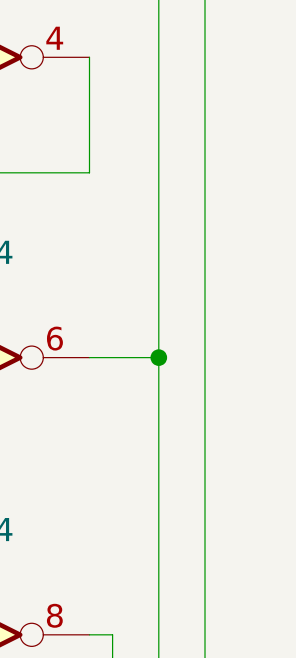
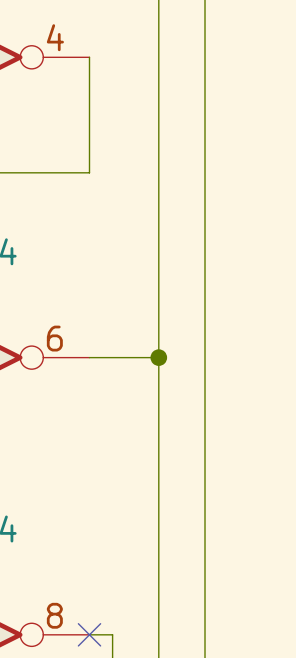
no-connect mark: none -> (89, 634)

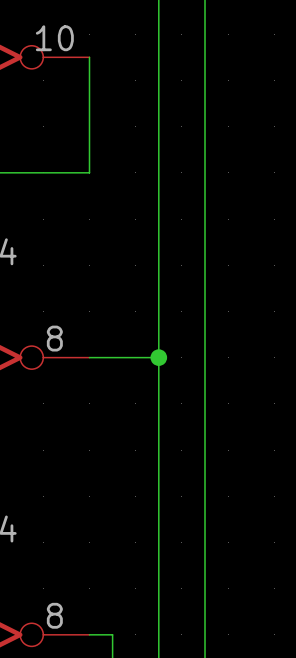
part pin number: 4 (55, 37) -> 10 (54, 38)
part pin number: 6 (54, 338) -> 8 (54, 338)
no-connect mark: (89, 634) -> none

